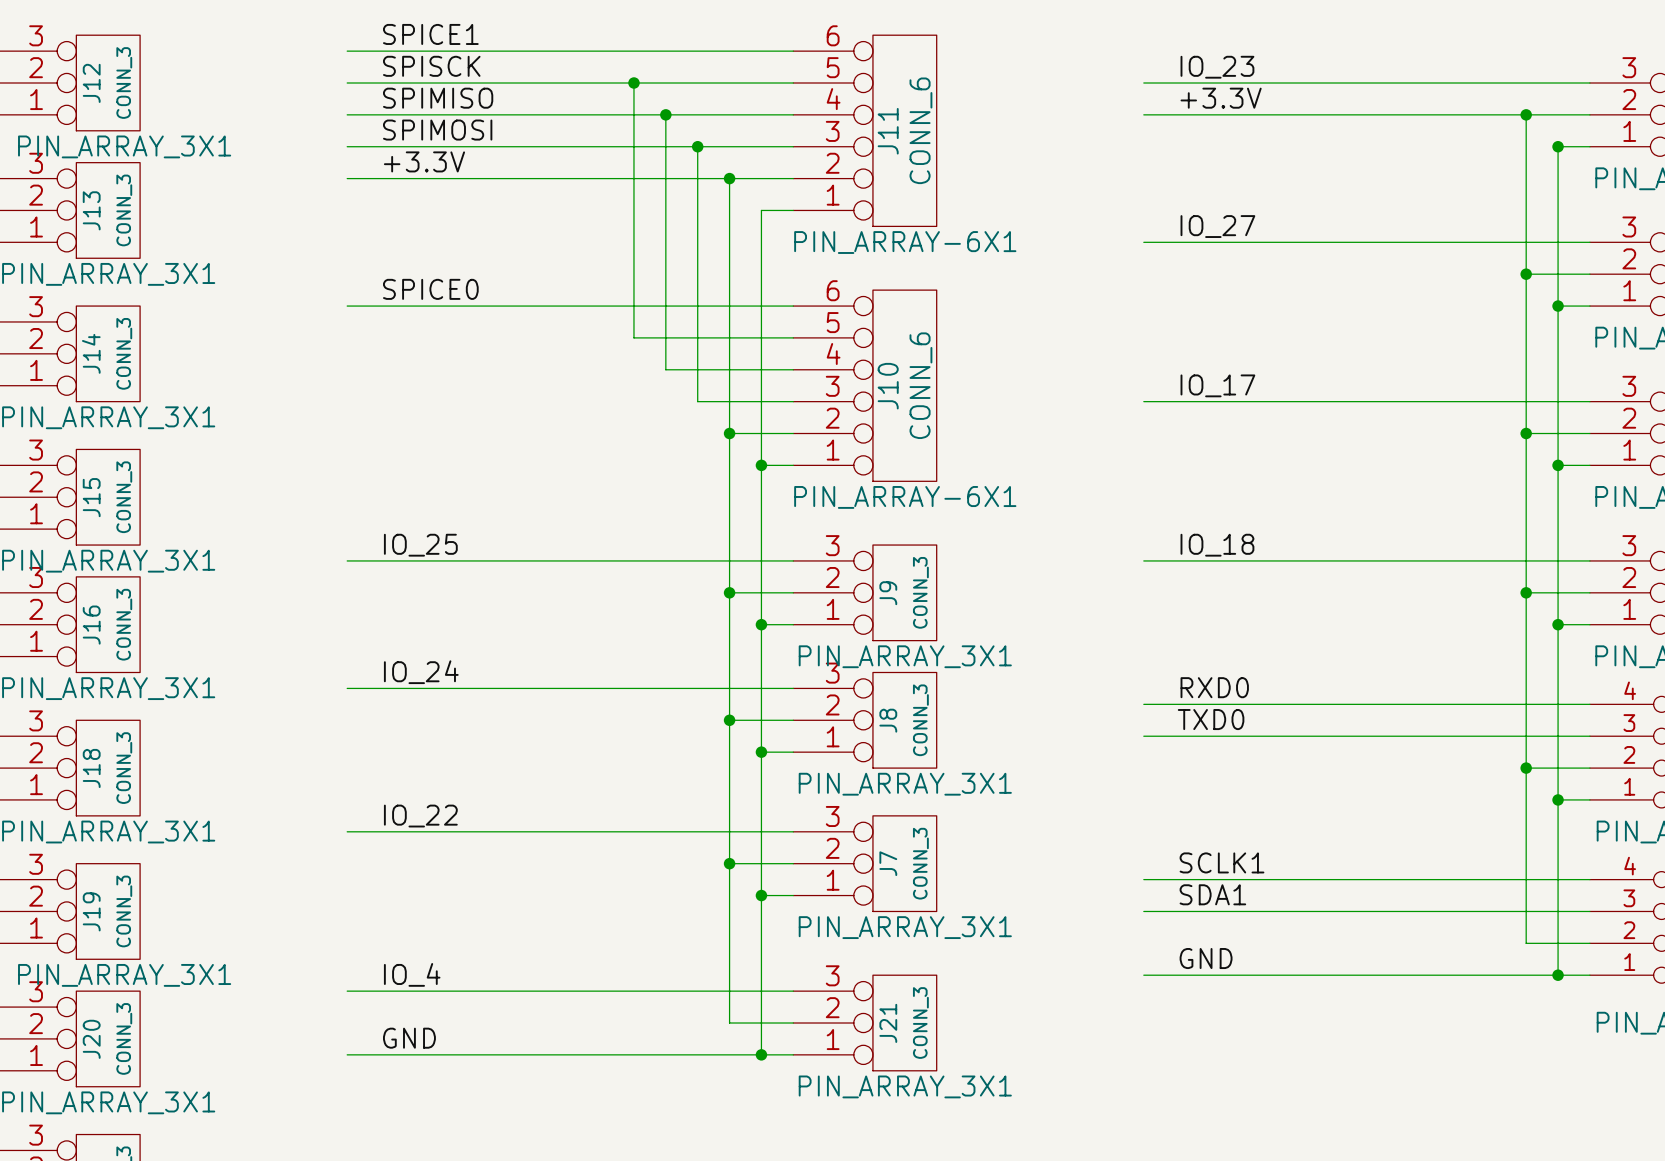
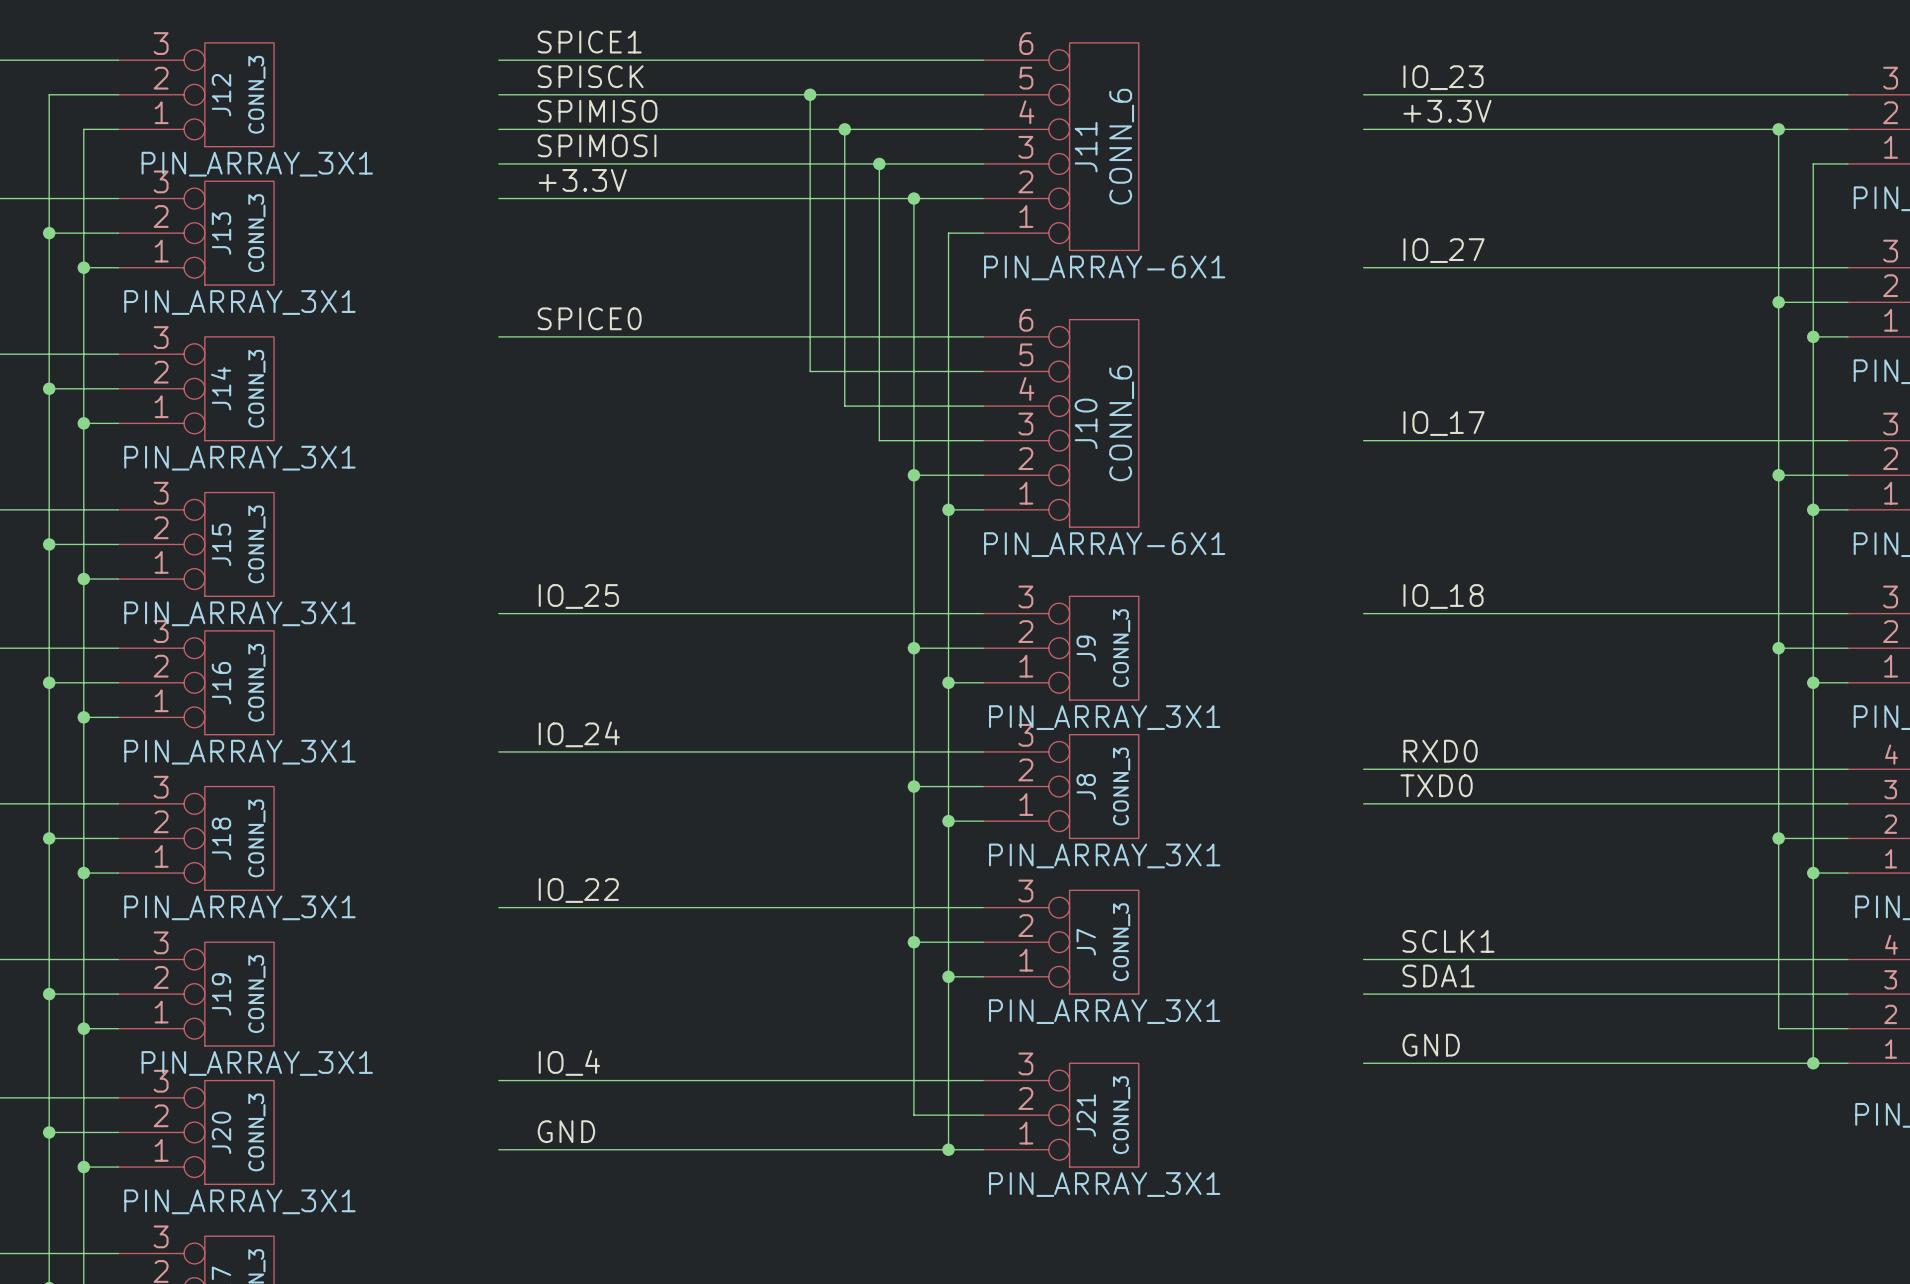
junction: (1558, 146) -> none

